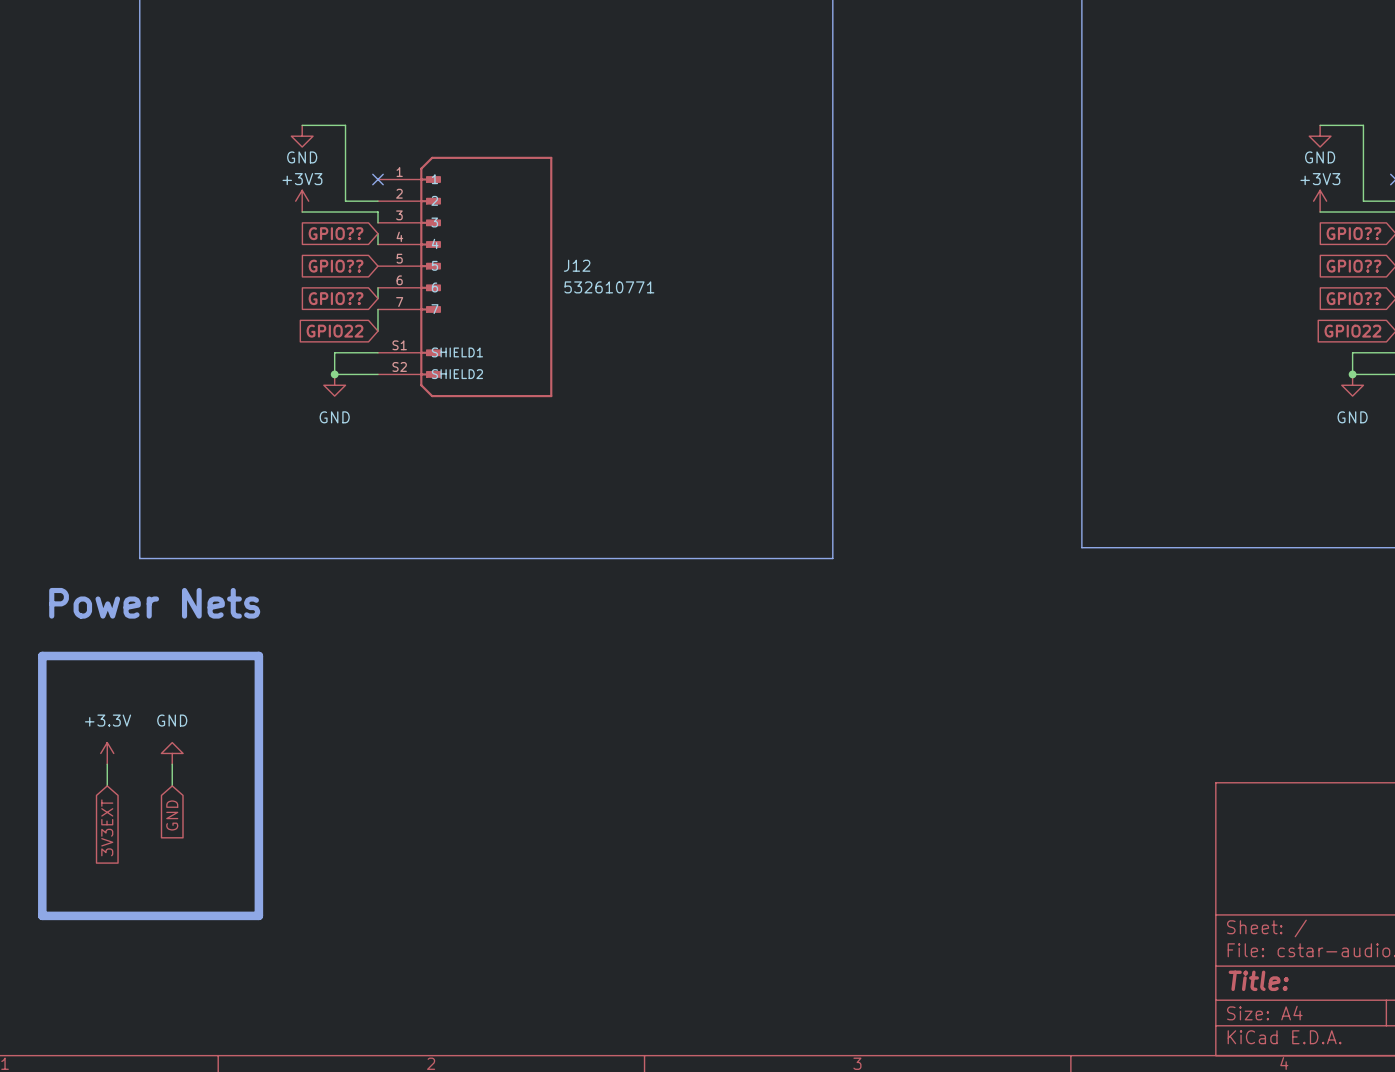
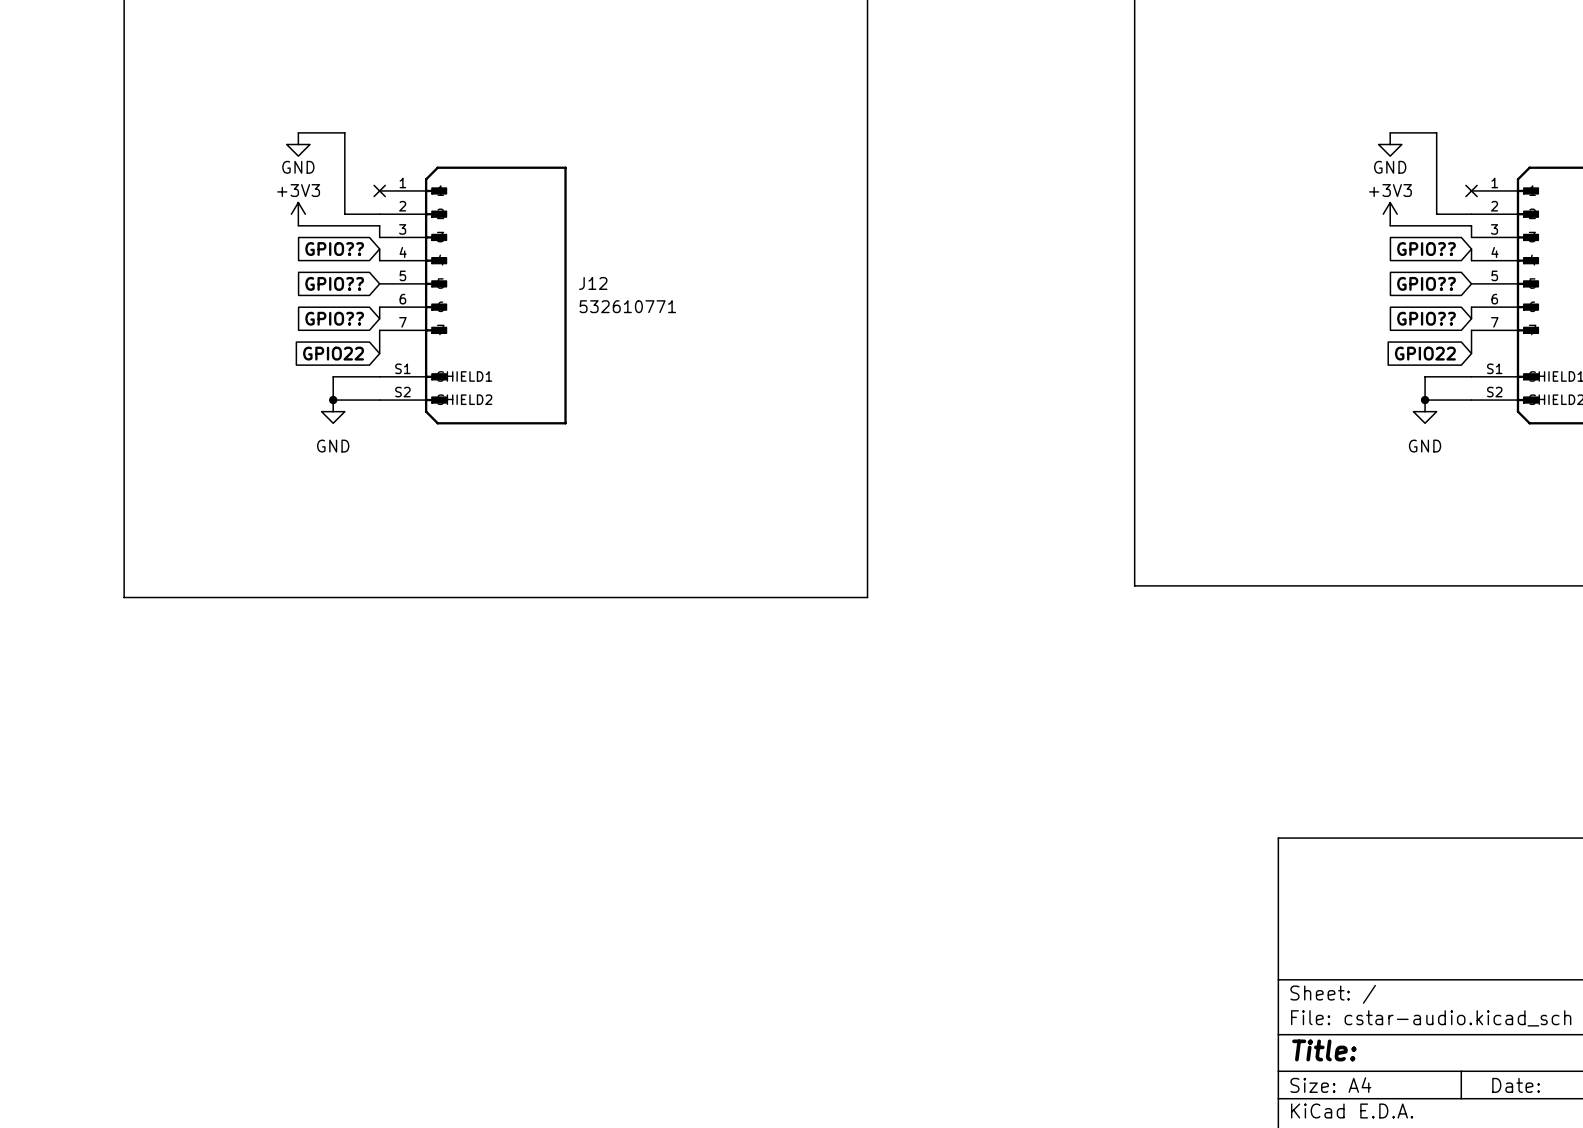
text: Power Nets (154, 603) -> none
line: (42, 655) (258, 655) (258, 915) (42, 915) (42, 655) -> none
power symbol: +3.3V (107, 753) -> none
power symbol: GND (172, 753) -> none
wire: (107, 764) (107, 785) -> none
wire: (172, 764) (172, 785) -> none
global label: GND (172, 815) -> none
global label: 3V3EXT (107, 827) -> none

